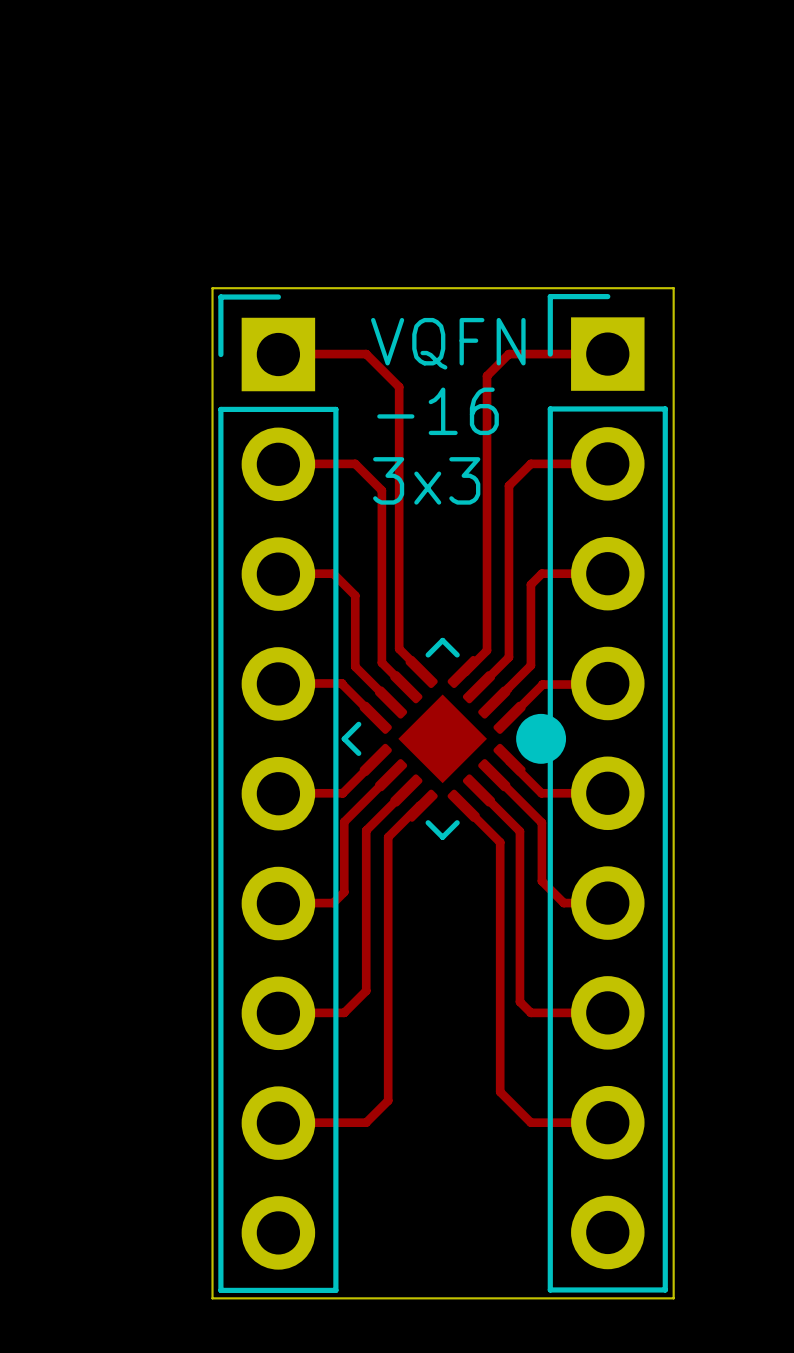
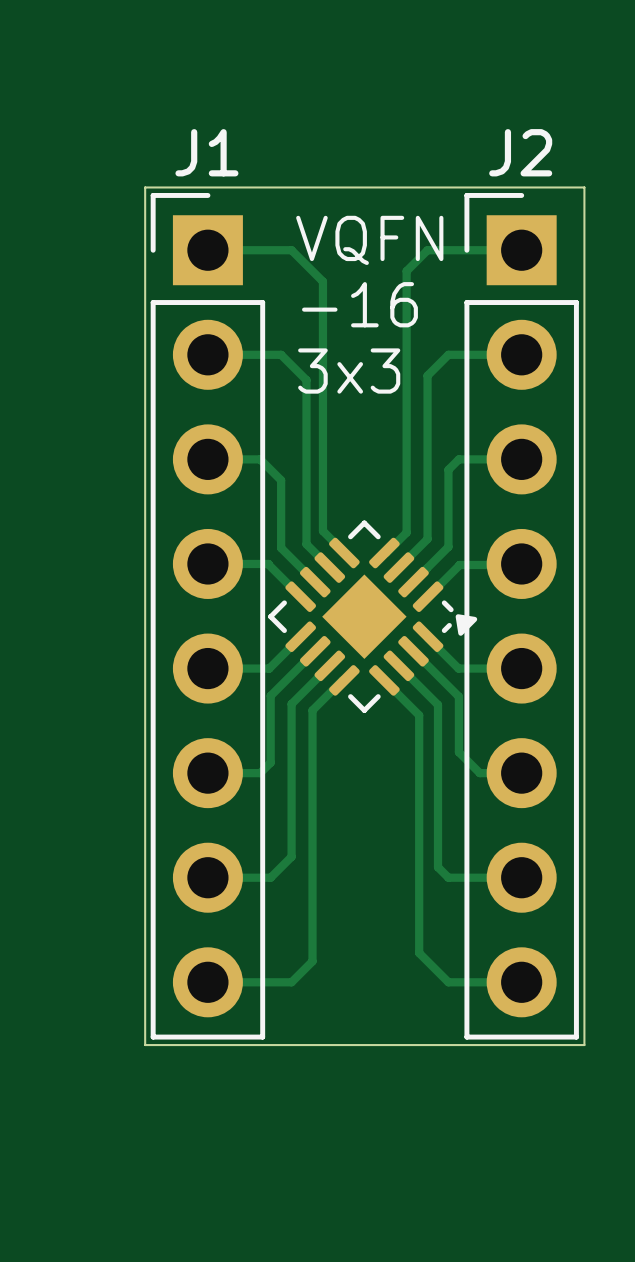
drawing: [516, 713, 567, 764] -> none
J1: none -> (207, 616)
J2: none -> (521, 616)
part: (278, 793) -> none
part: (607, 793) -> none
board edge: (212, 1188) (212, 1298) (673, 1298) (673, 1188) -> (145, 1045) (584, 1045)

